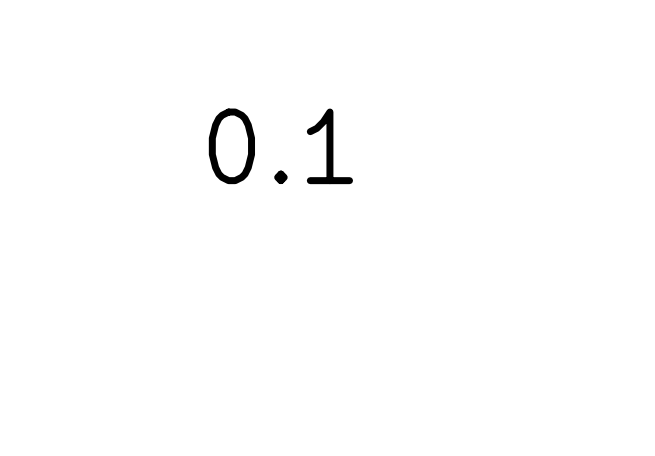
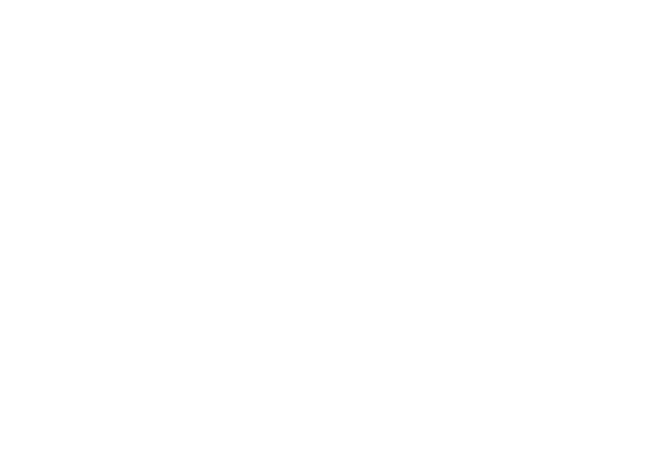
text: 0.1 (280, 146) -> none

